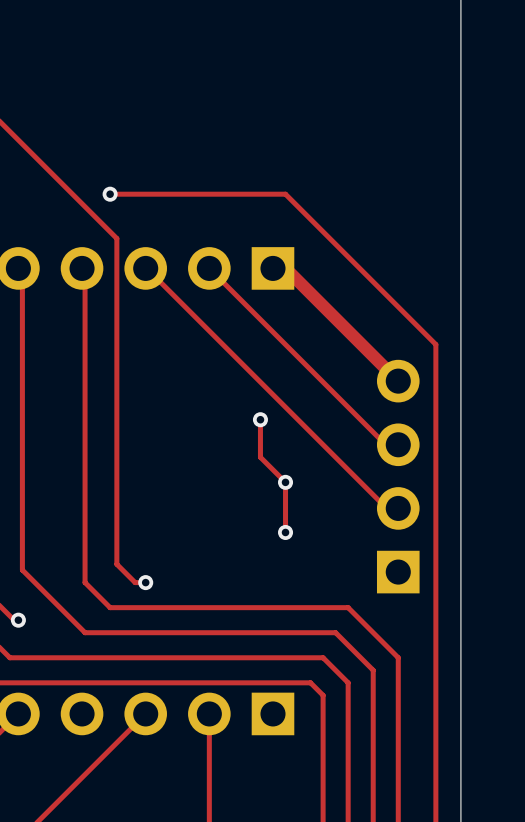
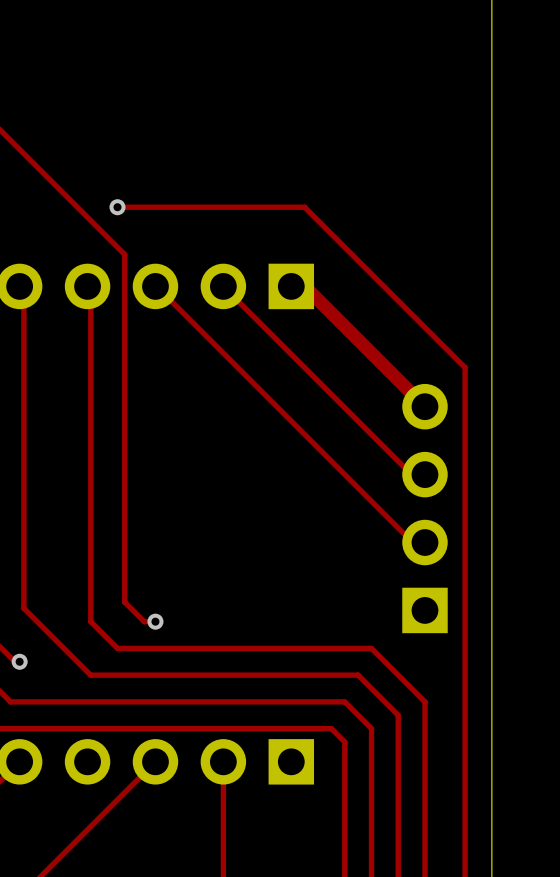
track: (260, 419) (260, 457) (285, 482) (285, 532) -> none
via: (260, 419) -> none
via: (285, 482) -> none
via: (285, 532) -> none

